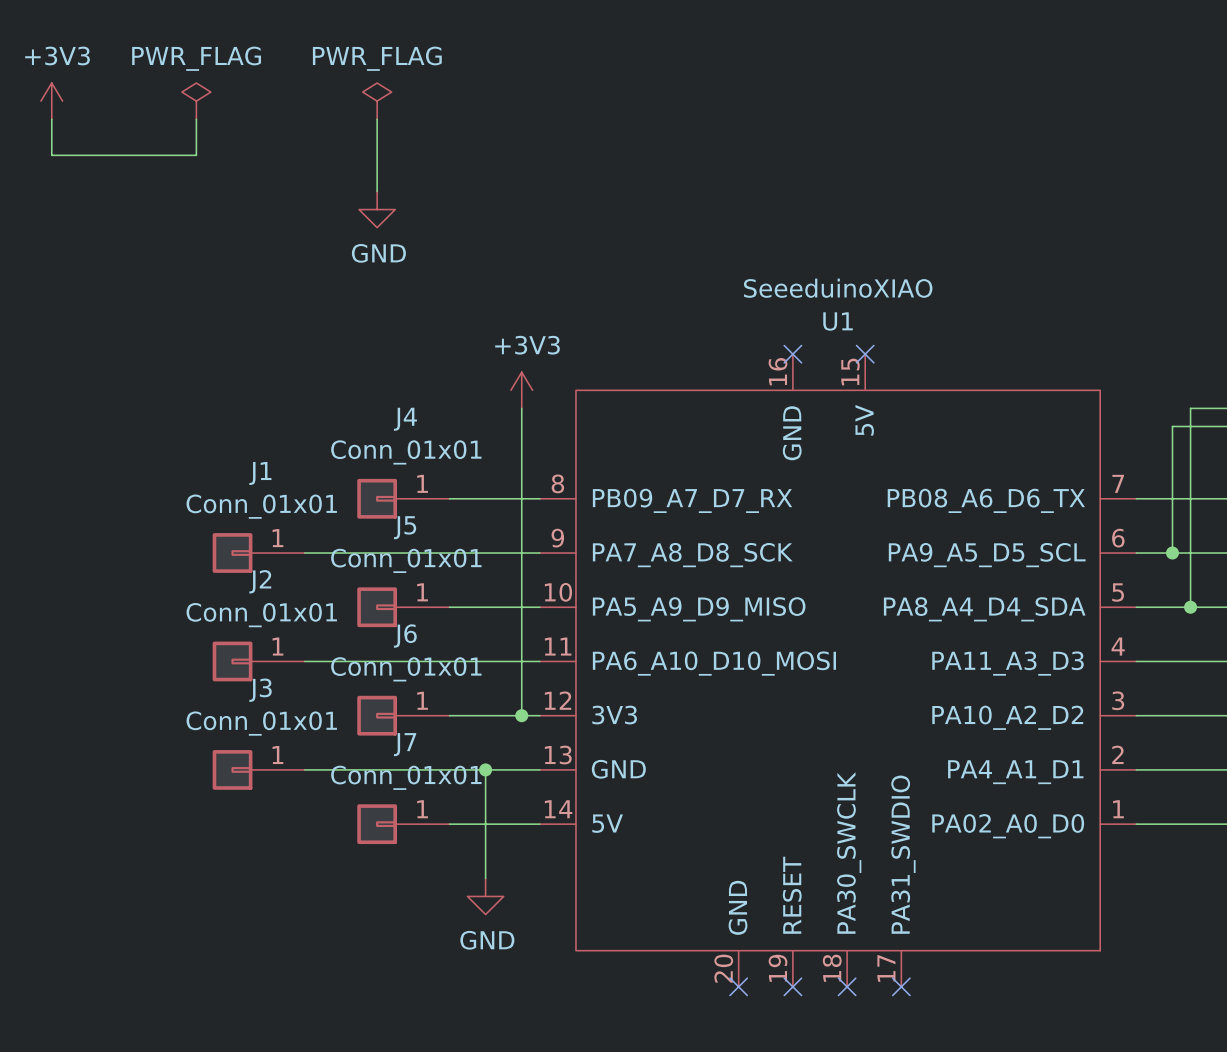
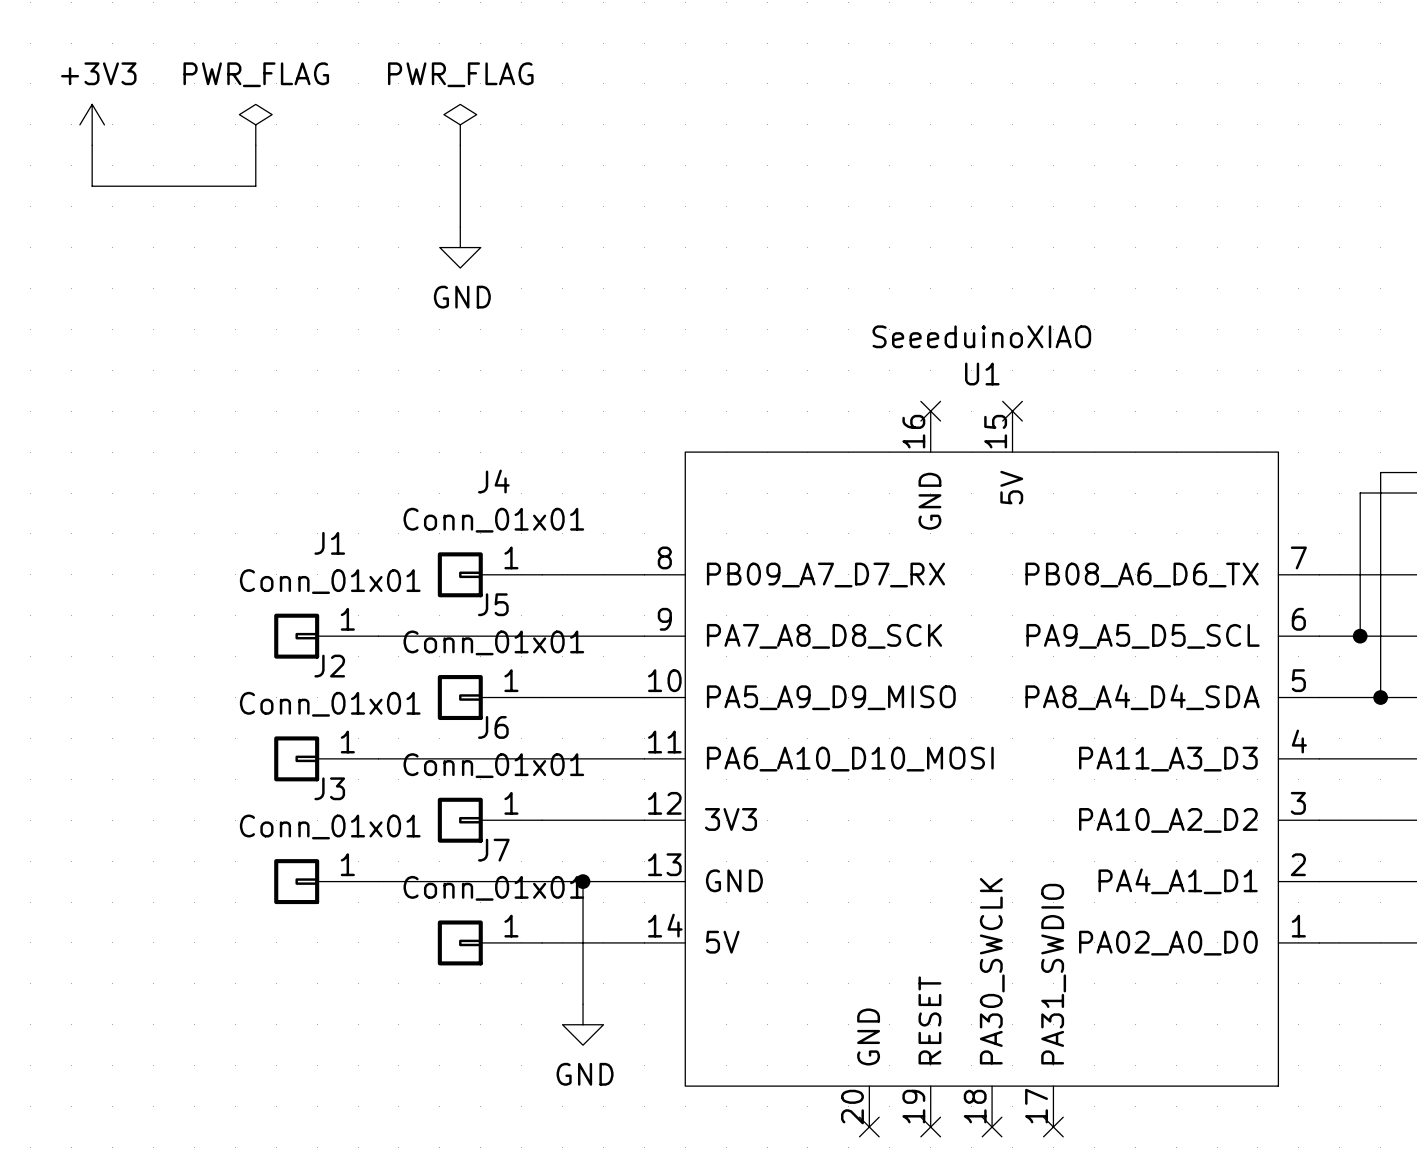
power symbol: +3V3 (521, 390) -> none
wire: (521, 408) (521, 715) -> none
junction: (521, 715) -> none

